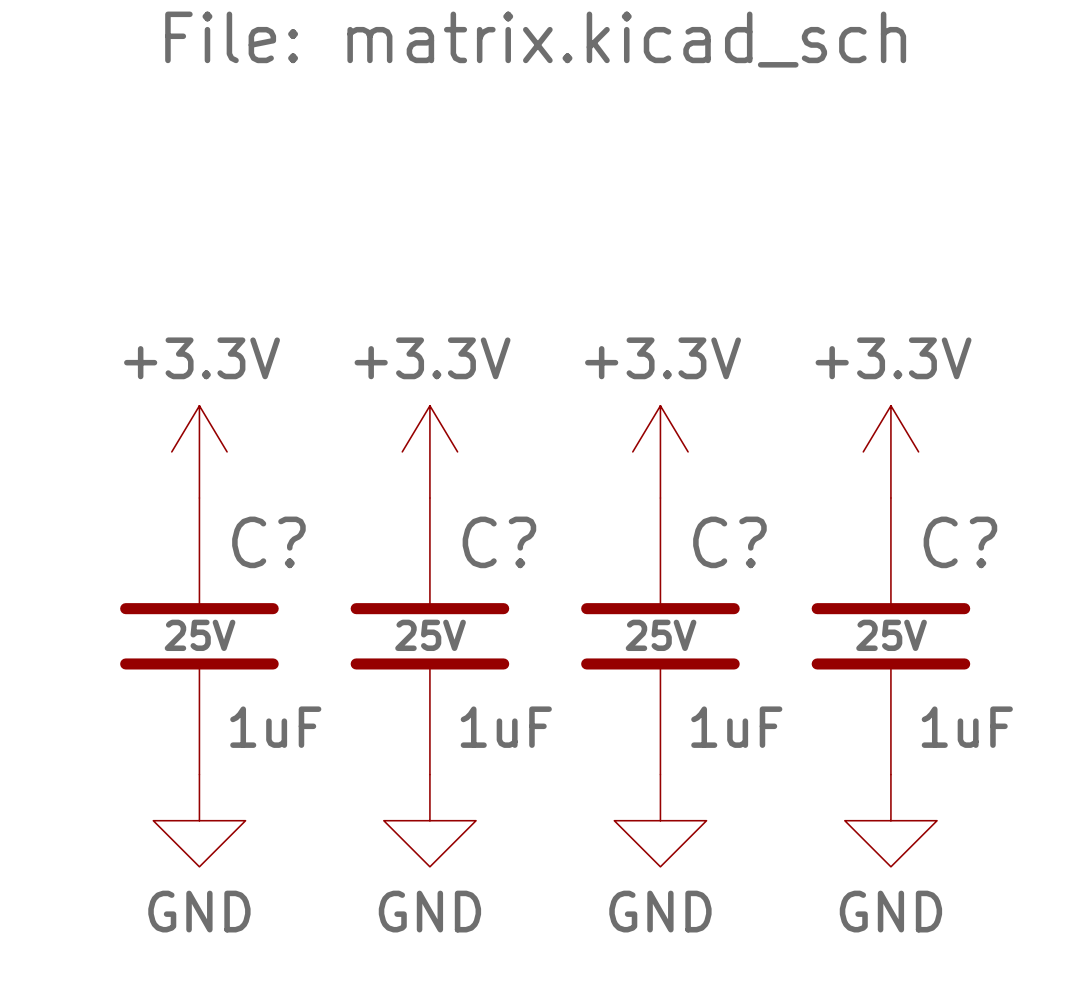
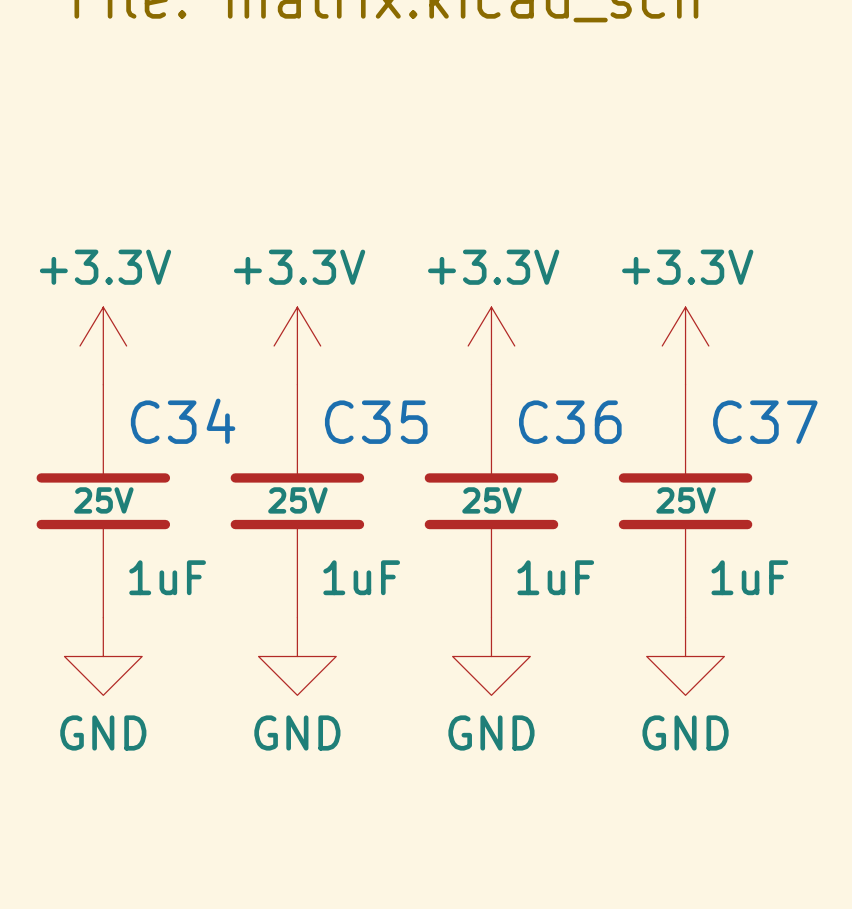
C? name: C? (268, 542) -> C34 (183, 421)
C? name: C? (499, 542) -> C35 (376, 422)
C? name: C? (729, 542) -> C36 (570, 422)
C? name: C? (960, 542) -> C37 (765, 422)

